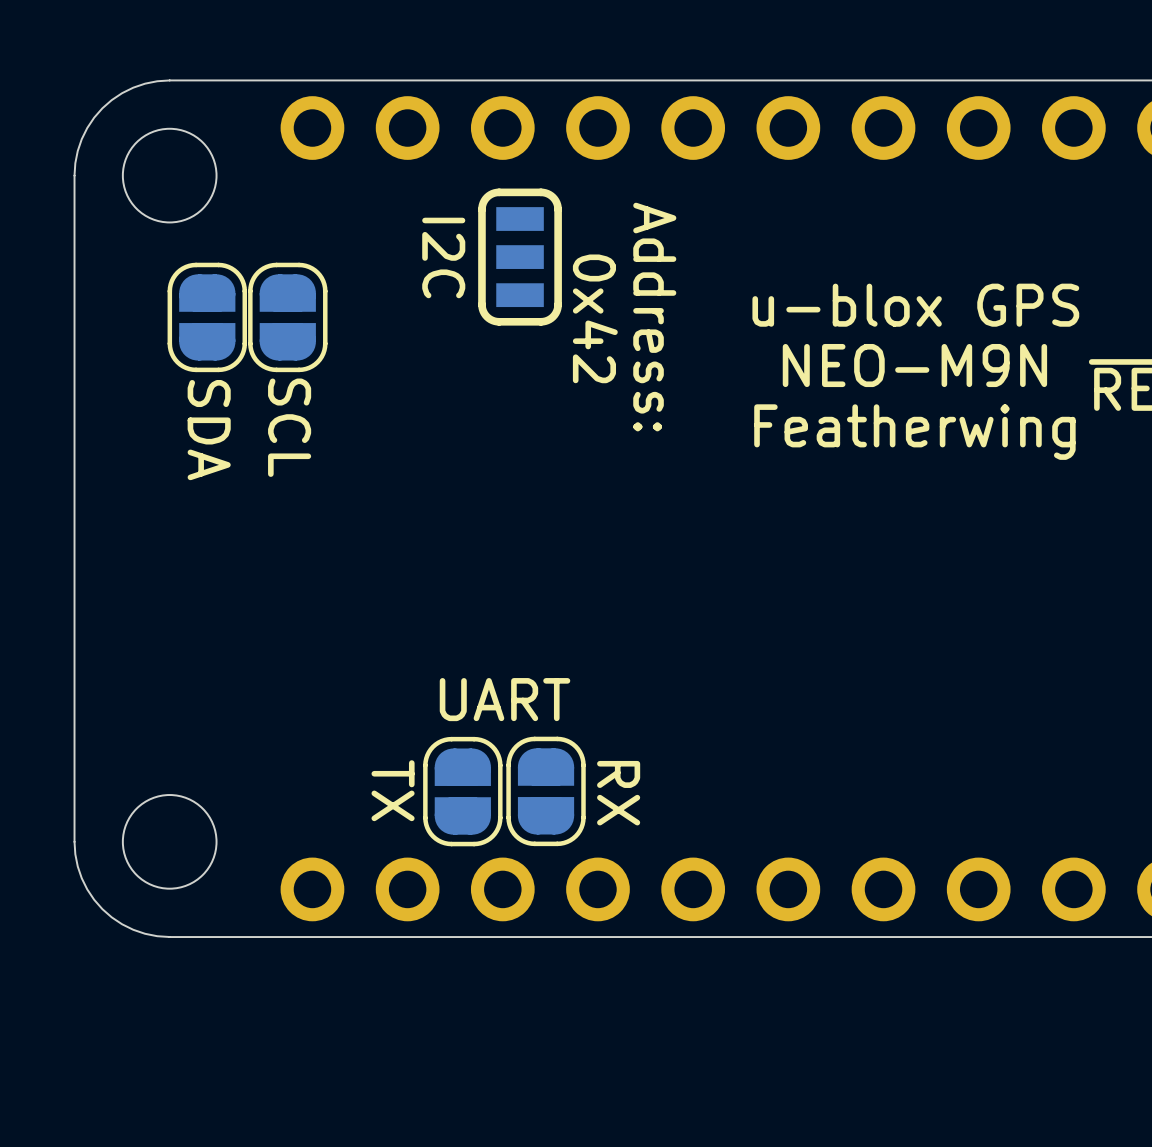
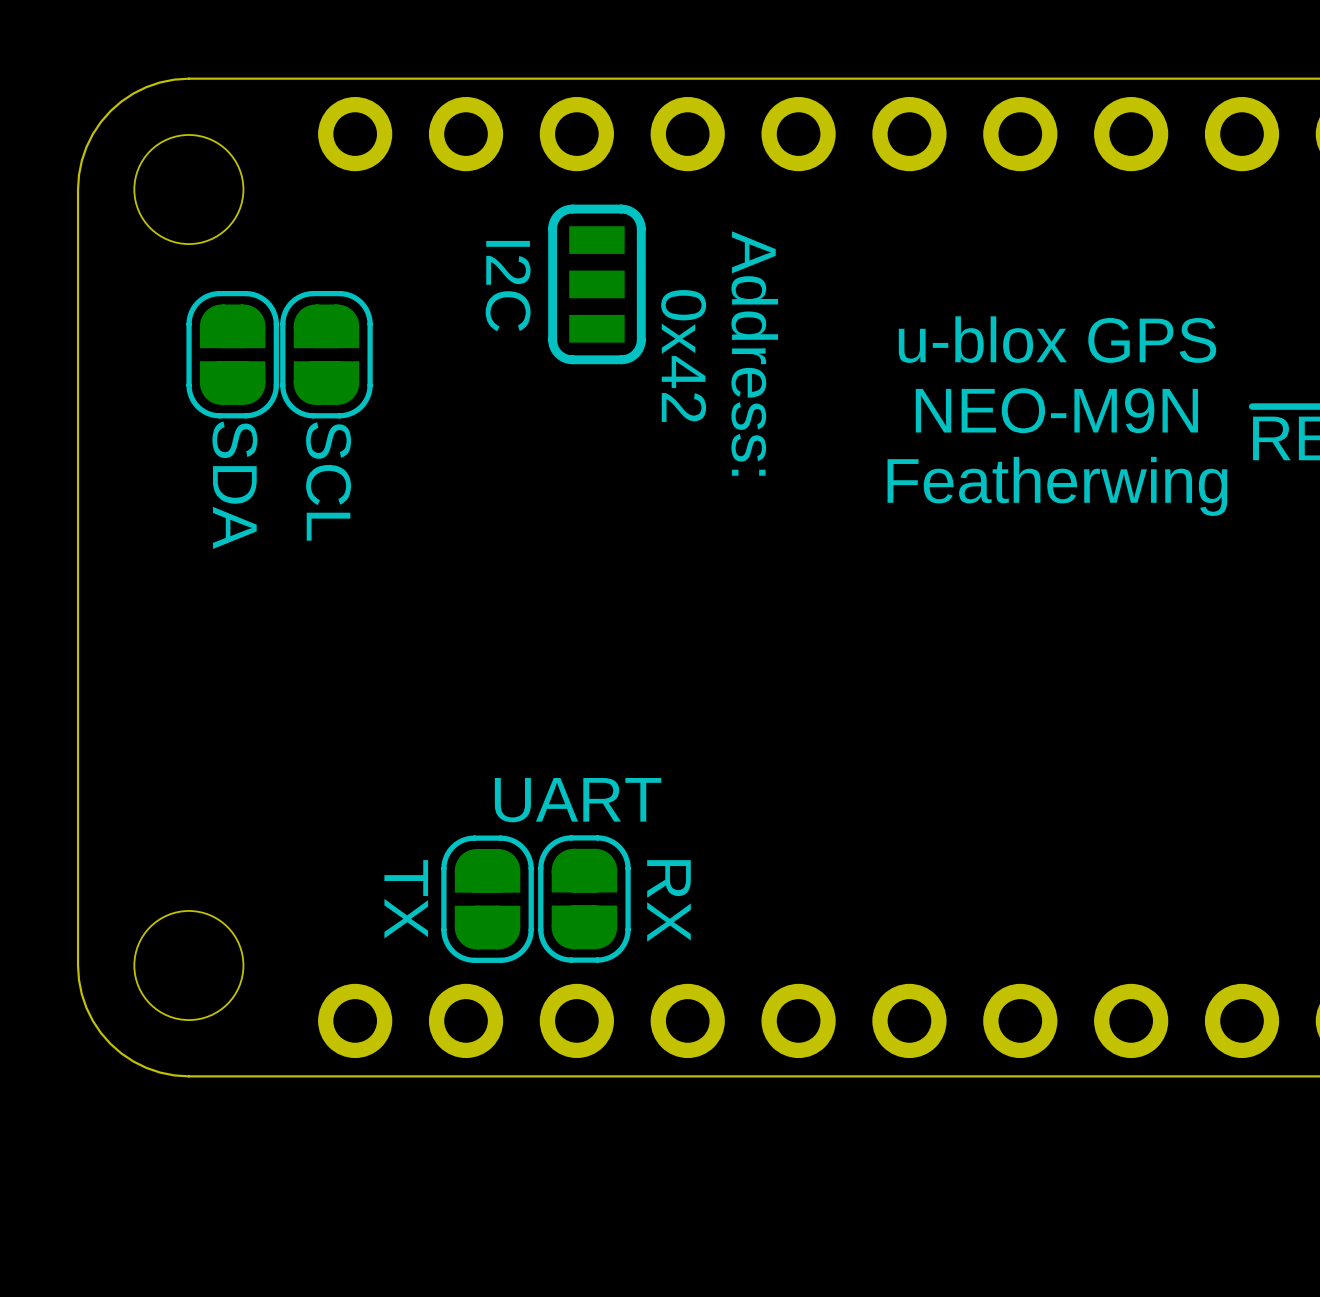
part position: (462, 791) -> (487, 899)
part position: (546, 791) -> (584, 899)

